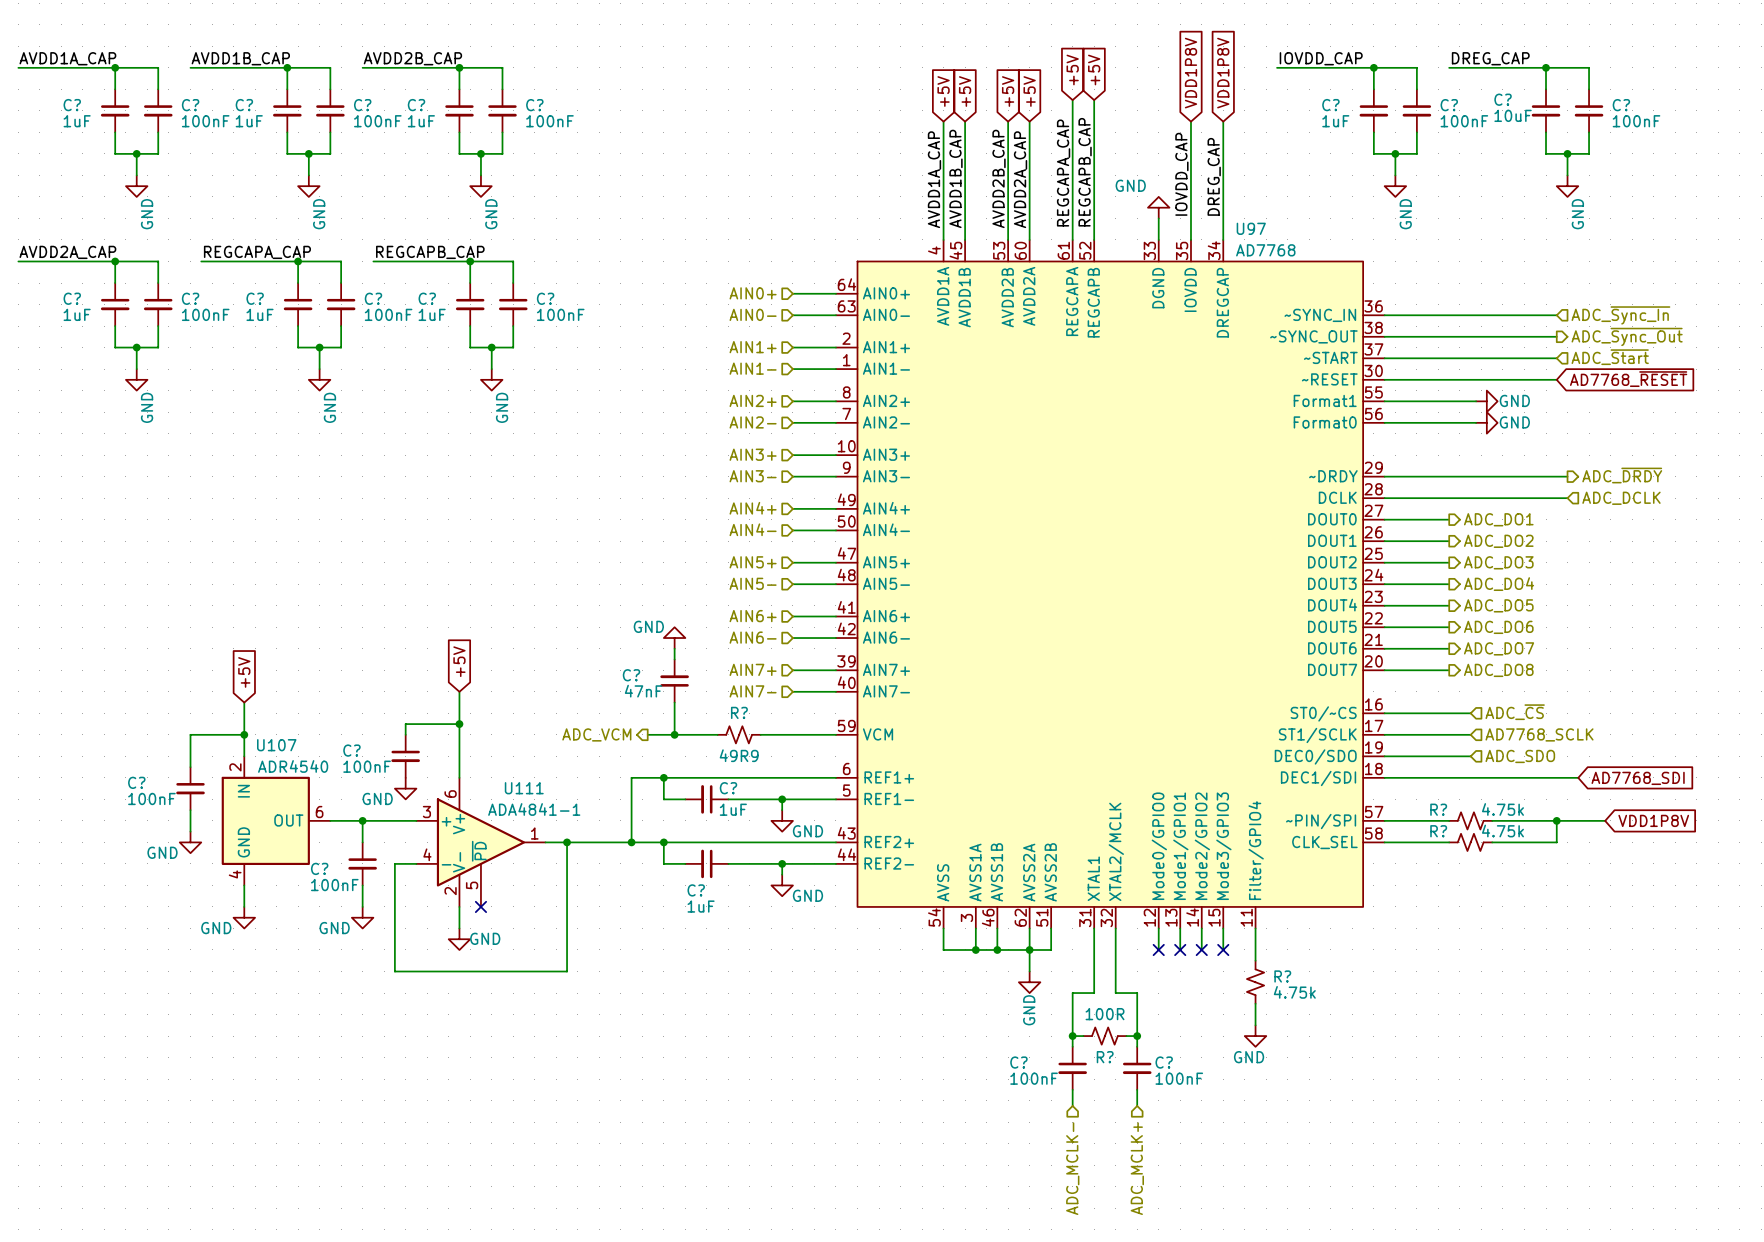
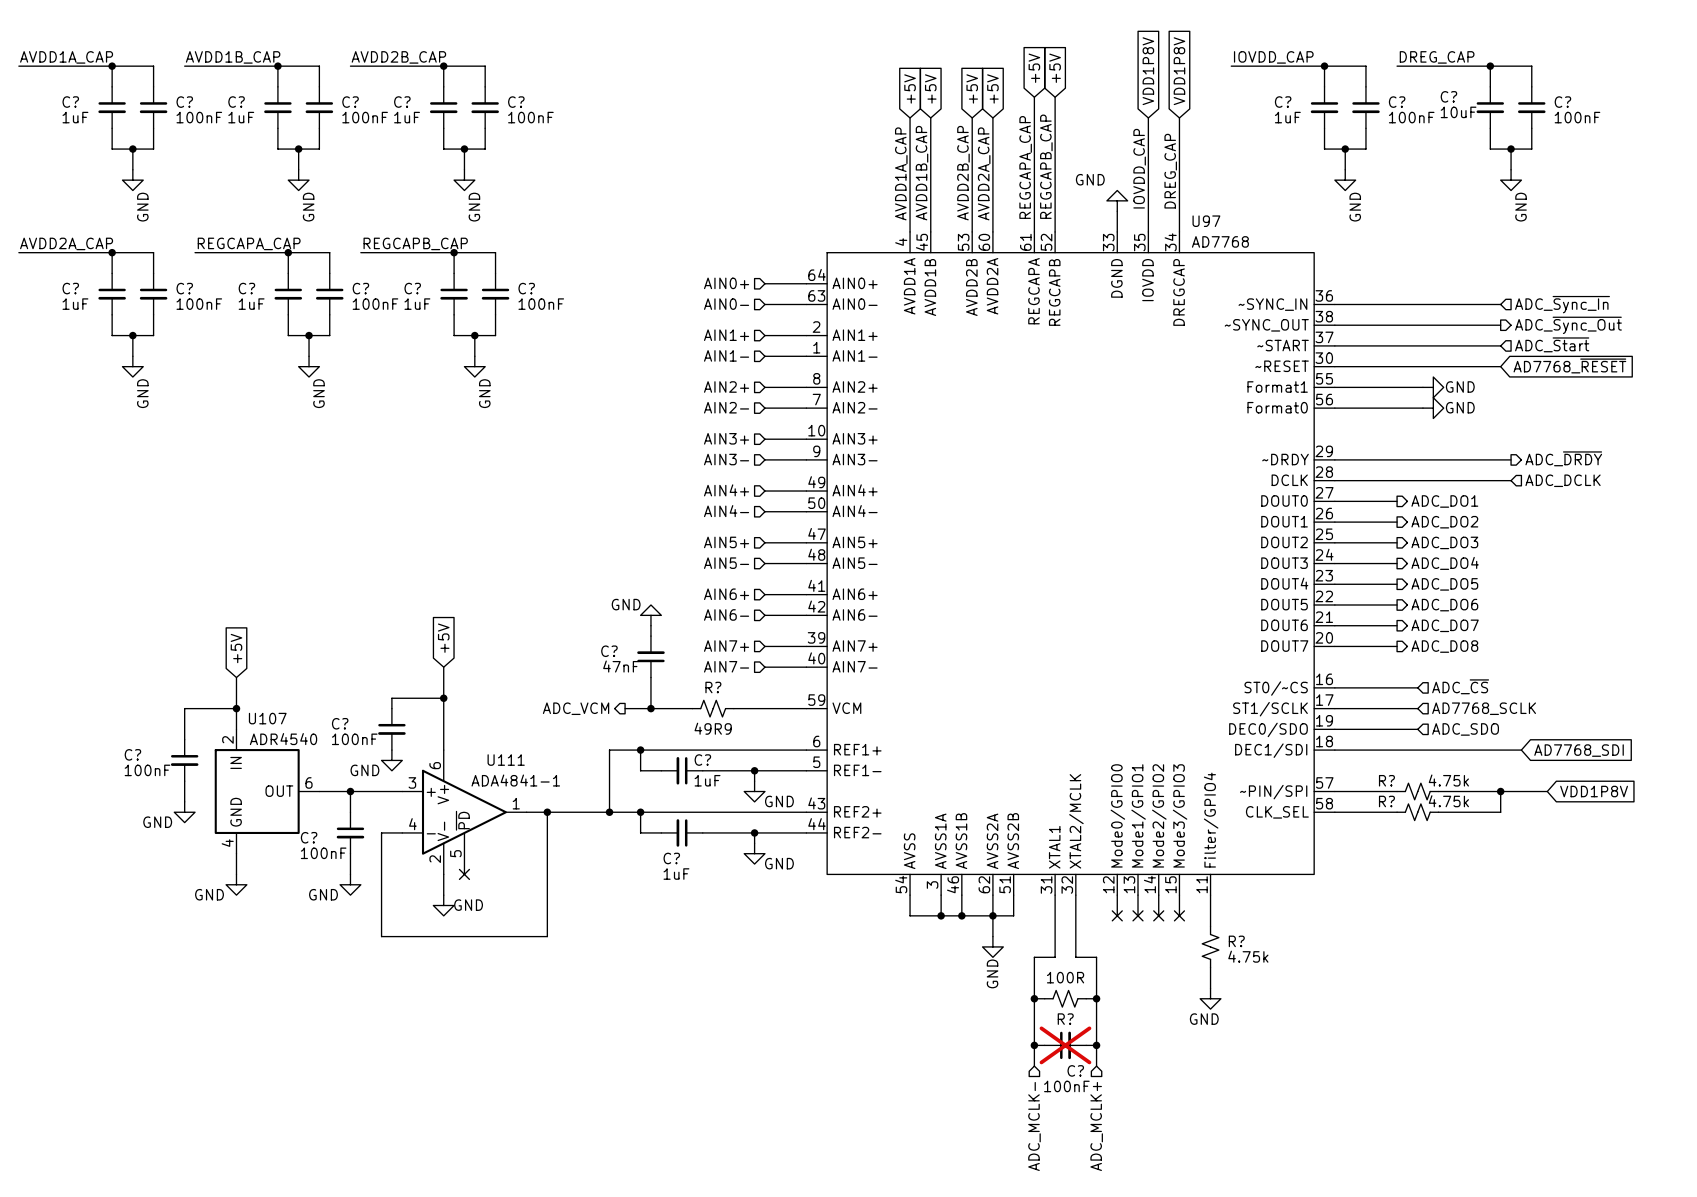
C?: 100nF (1072, 1068) -> none
C?: 100nF (1137, 1068) -> none
wire: none -> (1034, 1045) (1044, 1045)
junction: none -> (1034, 1045)
C?: none -> 100nF (1065, 1045)
wire: none -> (1086, 1045) (1096, 1045)
junction: none -> (1096, 1045)

